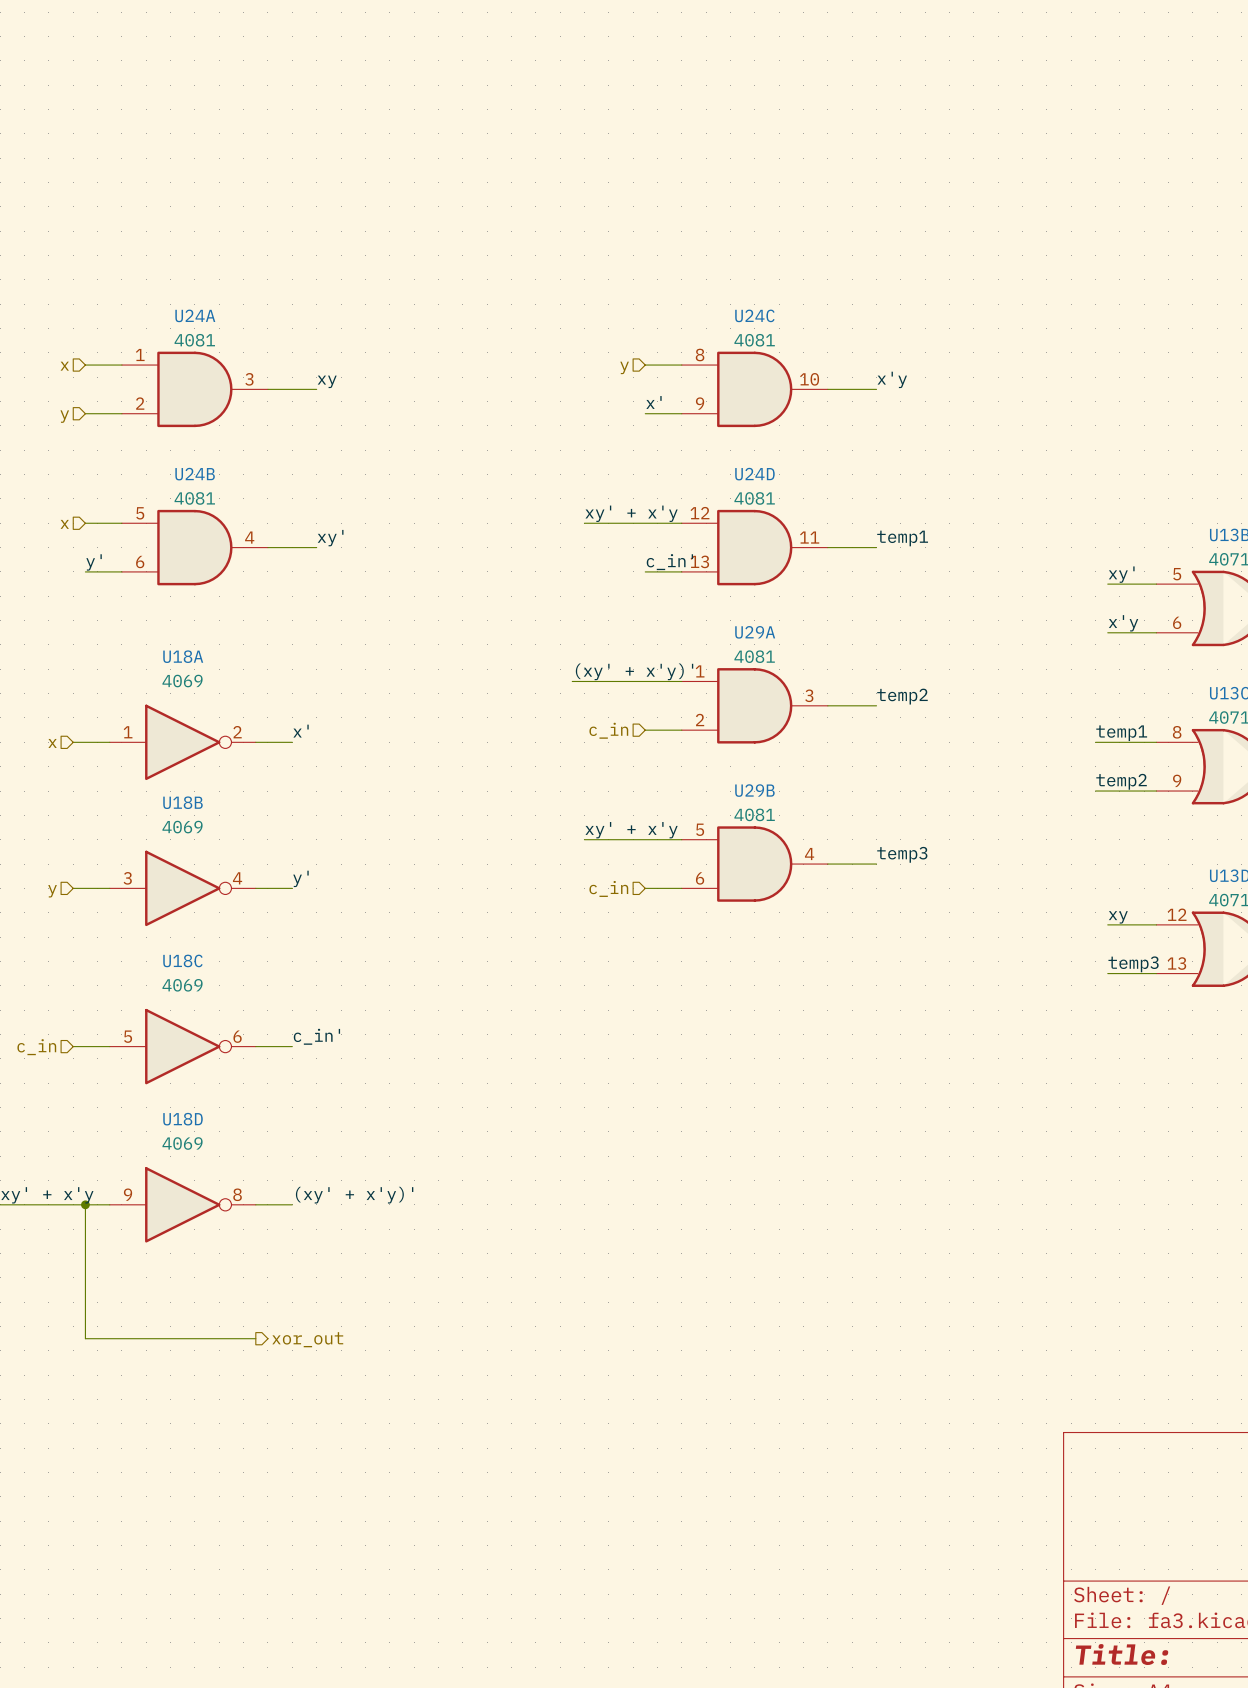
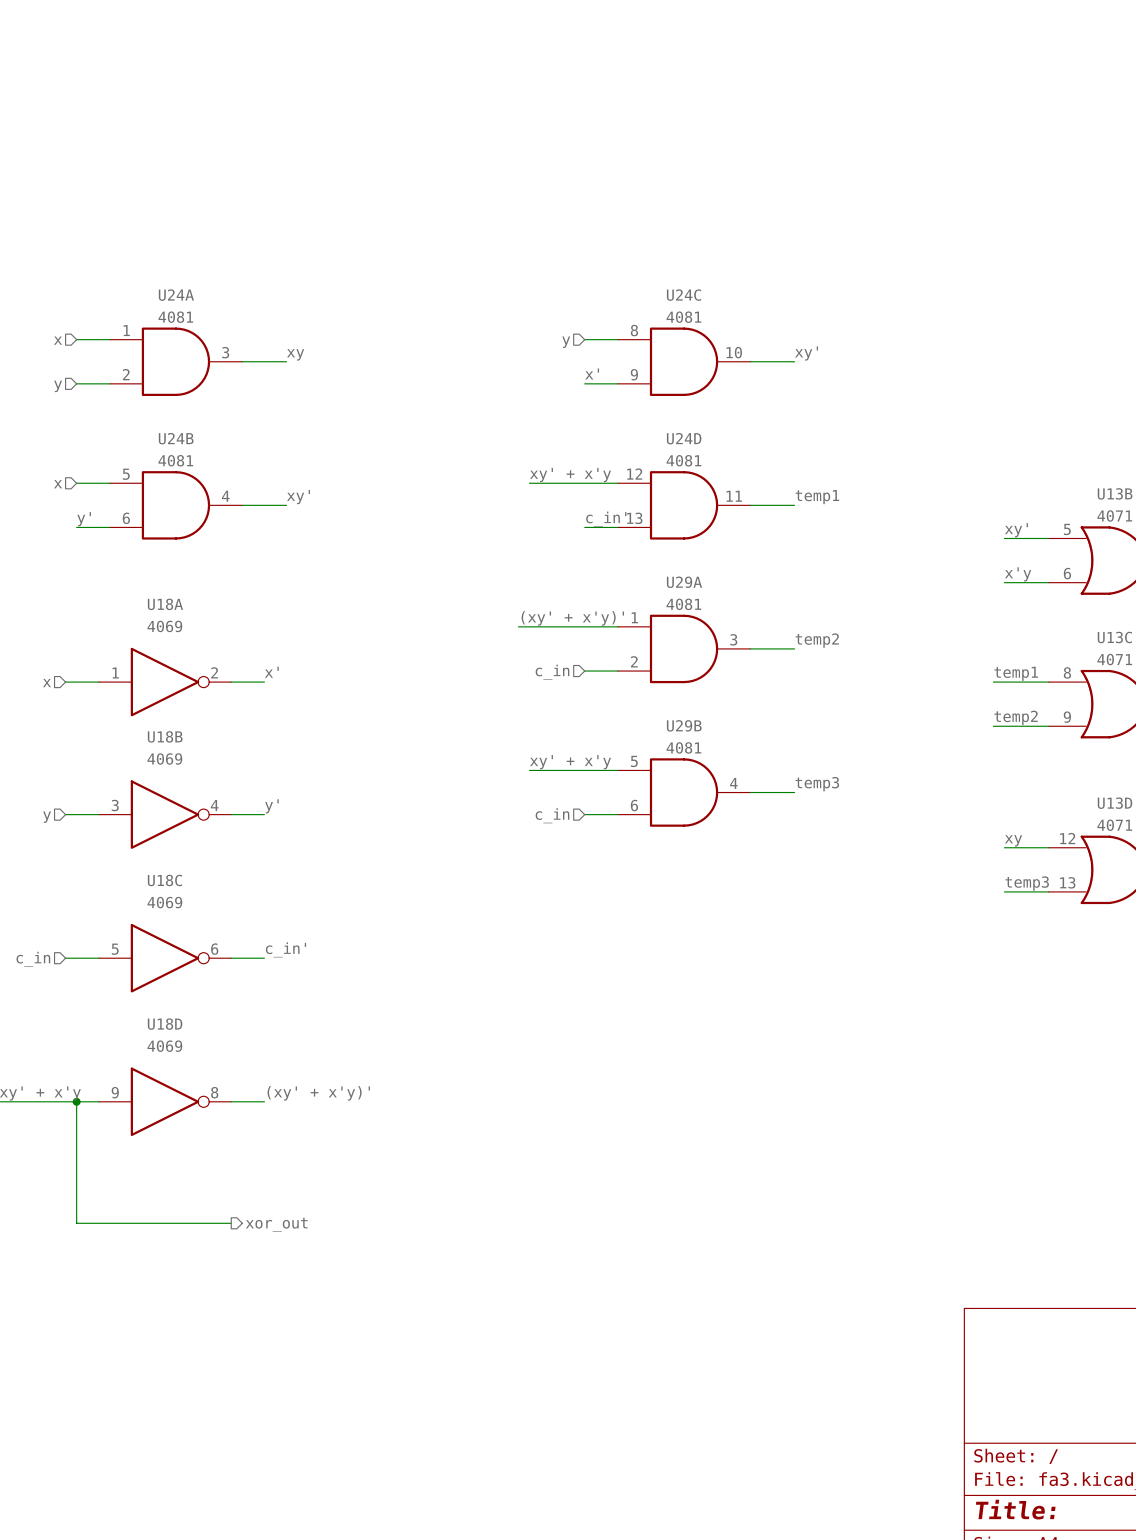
label: x'y (892, 379) -> xy' (806, 353)

